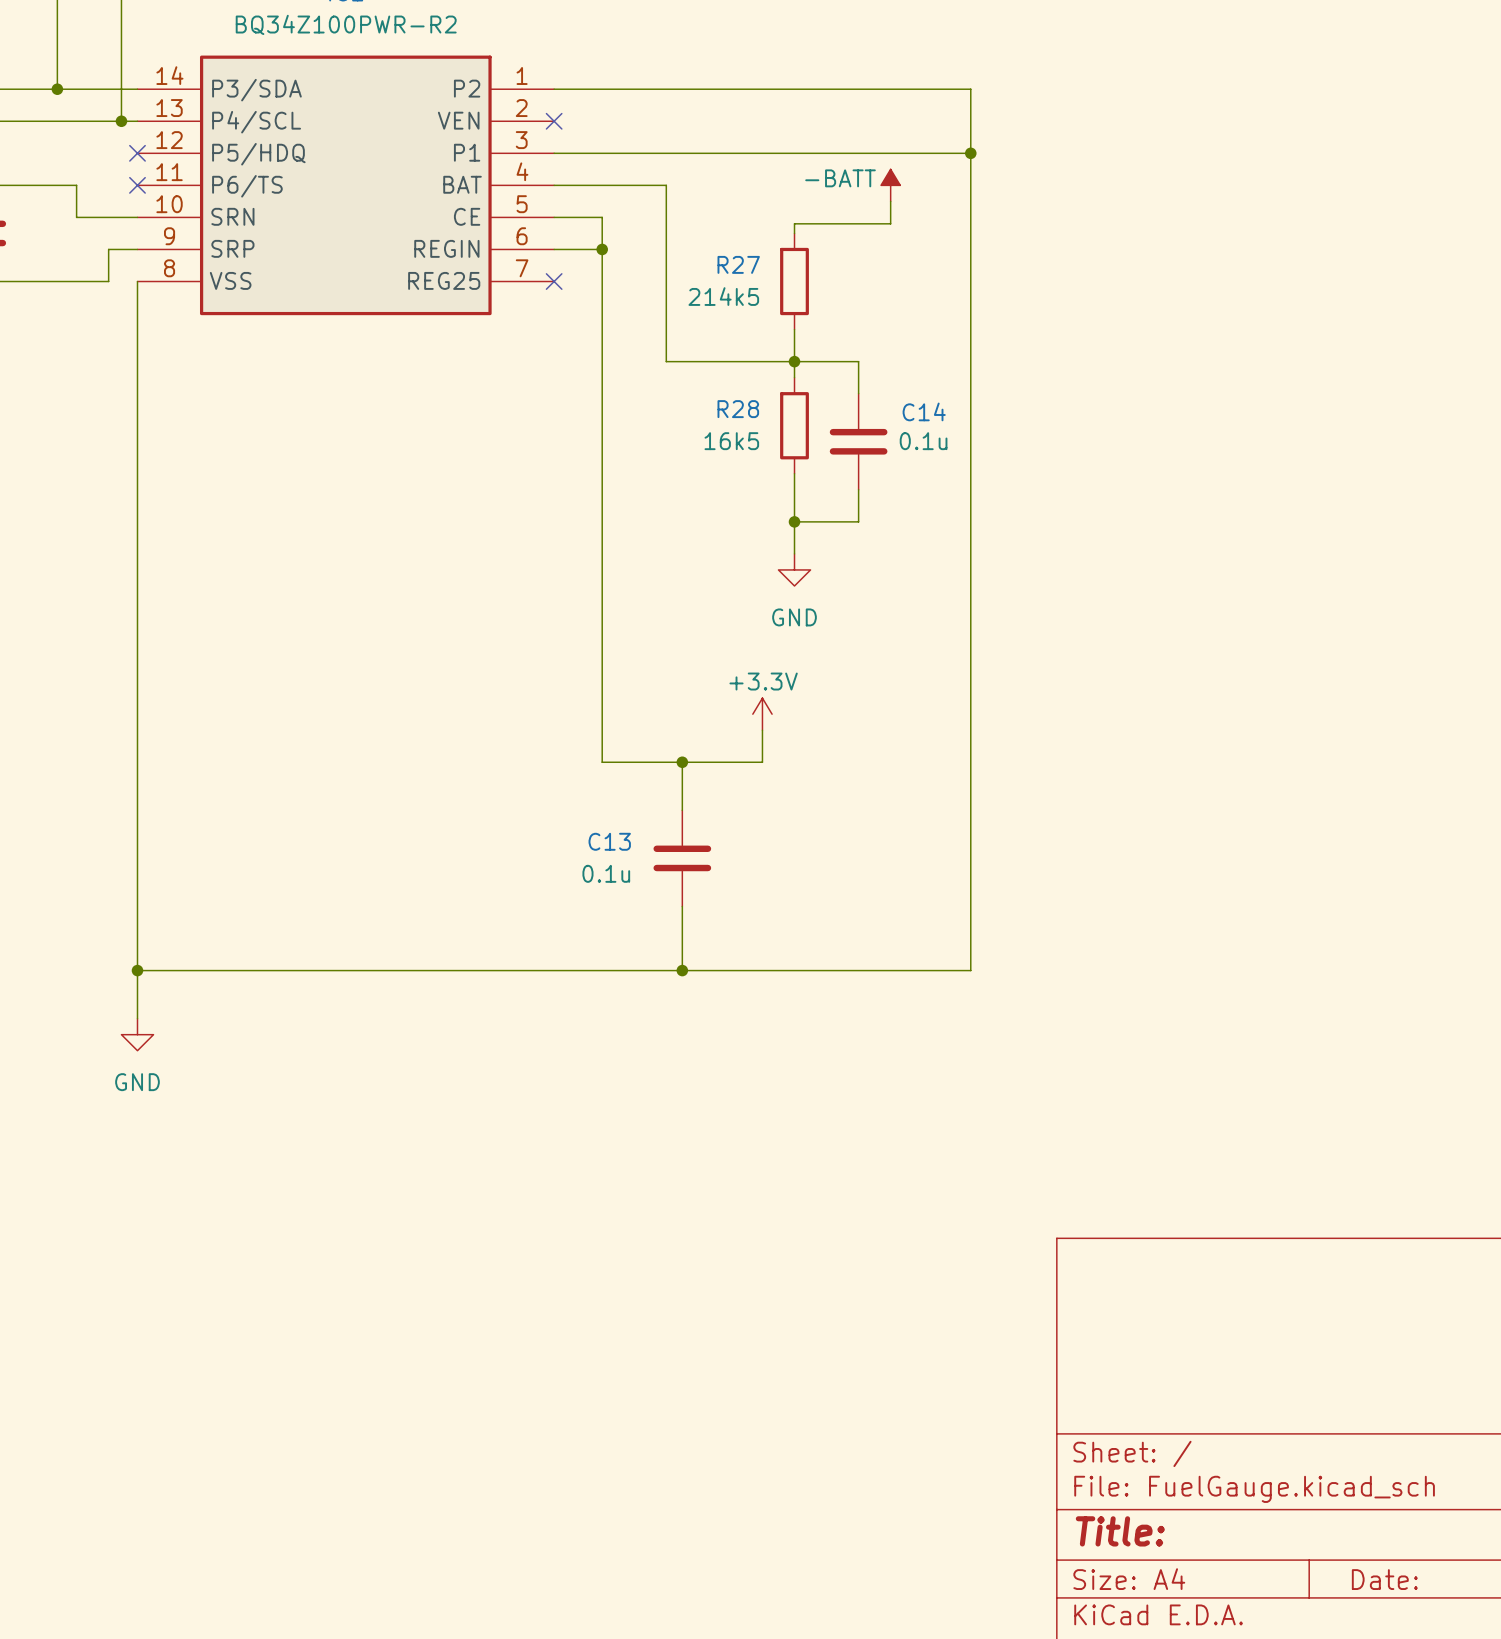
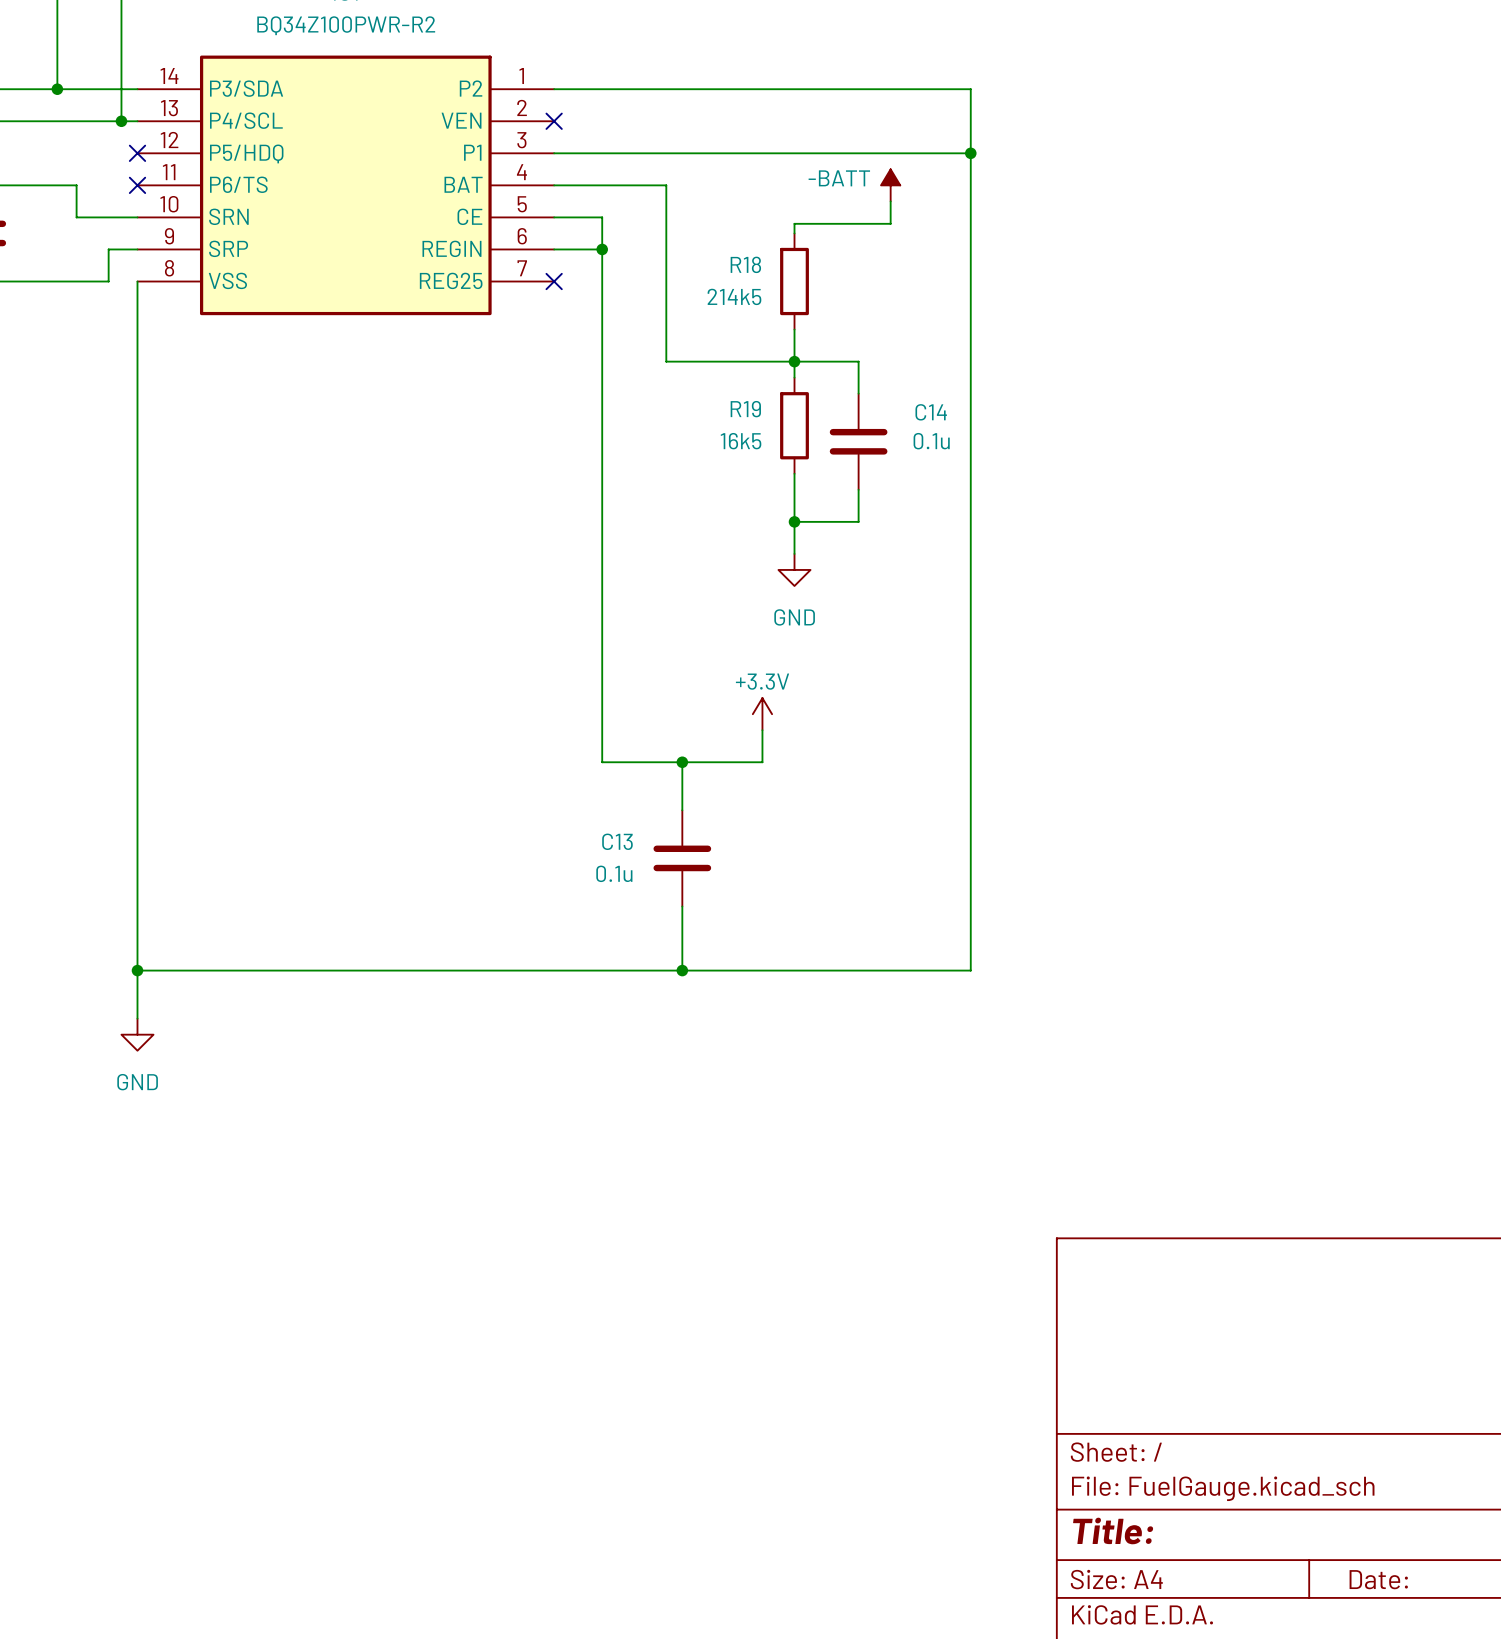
R27 name: R27 (738, 264) -> R18 (745, 264)
R28 name: R28 (738, 409) -> R19 (745, 409)

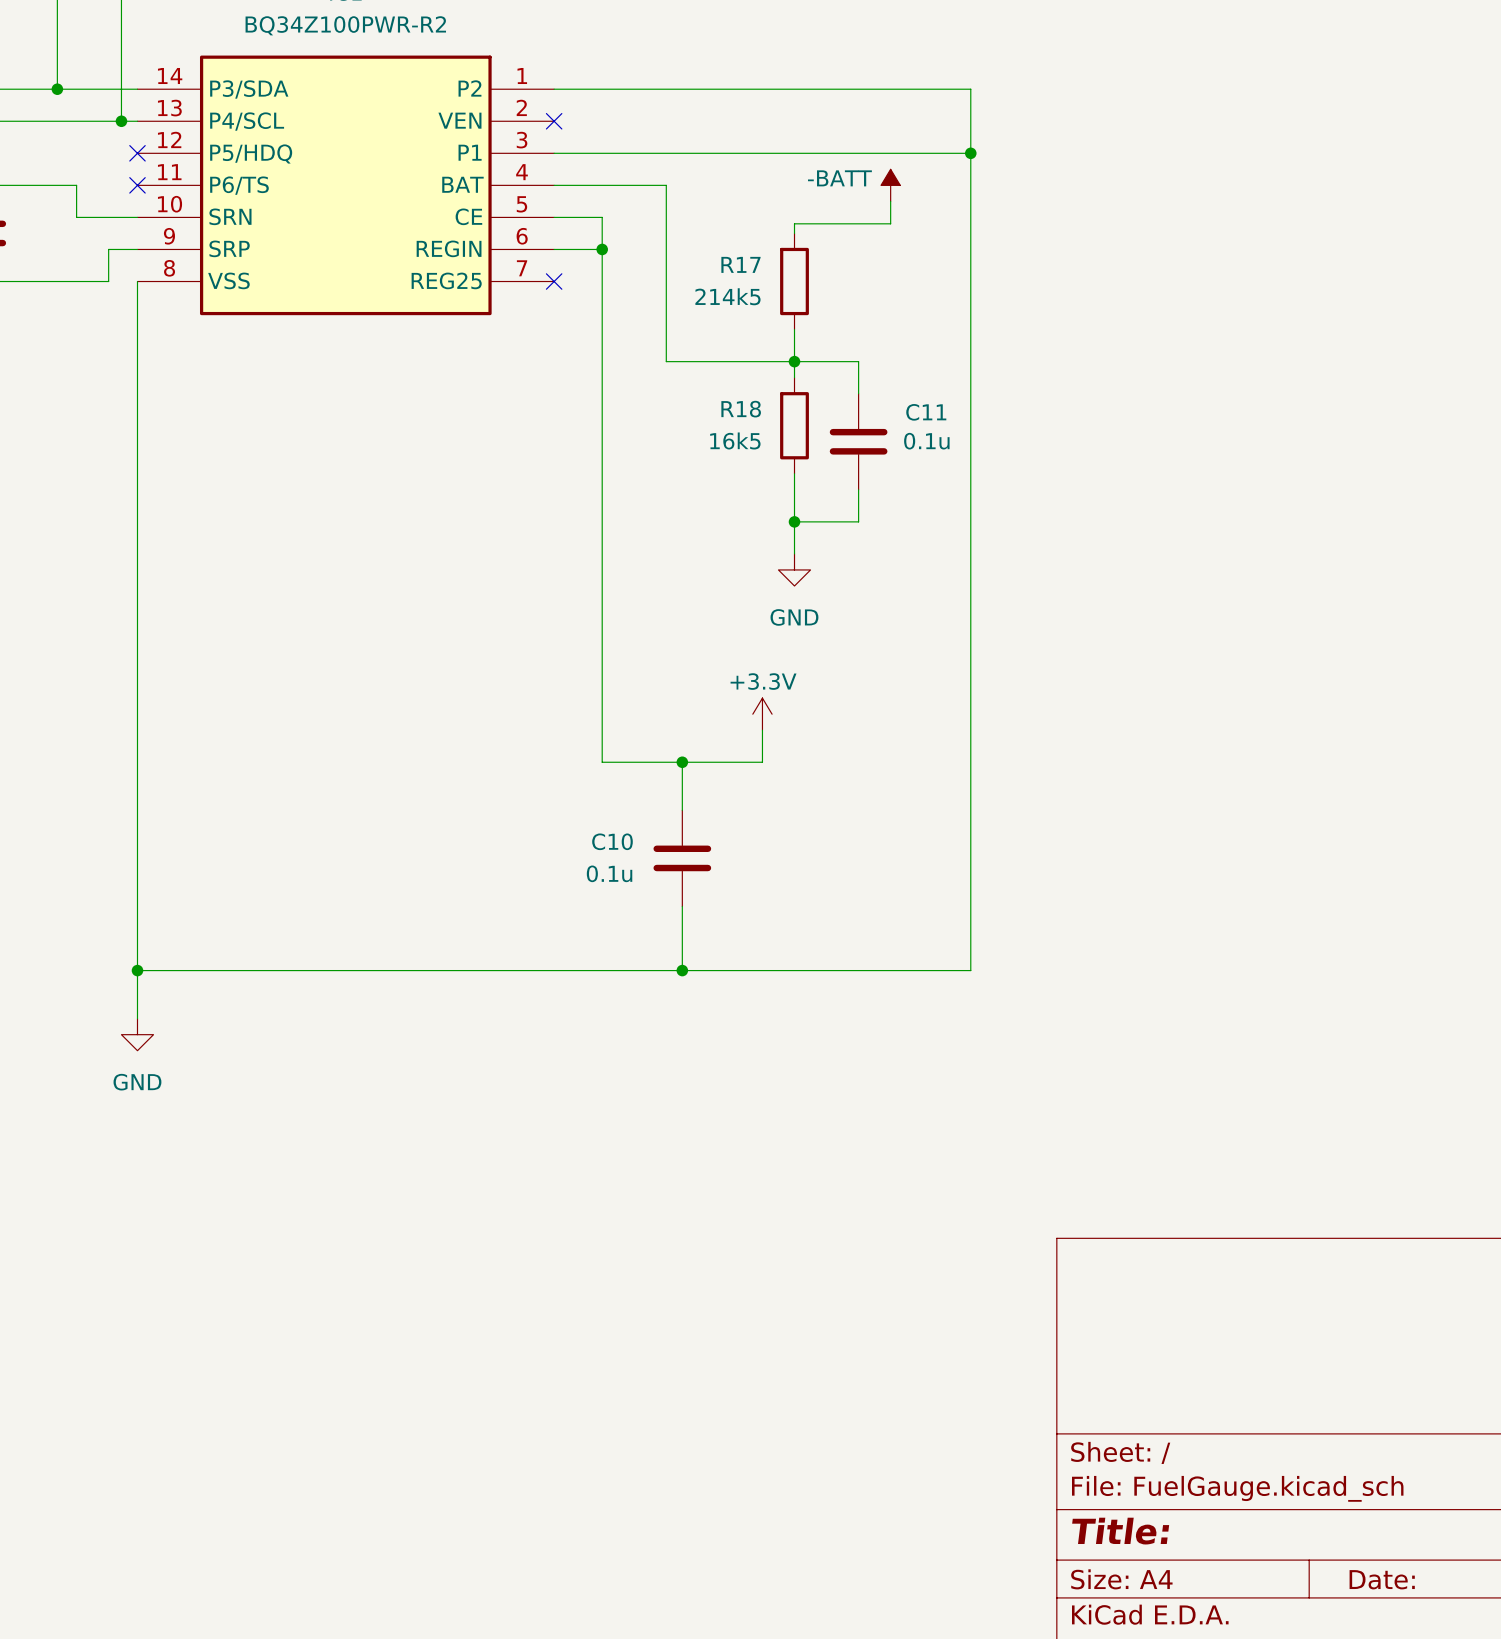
R18 name: R18 (745, 264) -> R17 (740, 264)
R19 name: R19 (745, 409) -> R18 (741, 409)
C14 name: C14 (931, 412) -> C11 (926, 412)
C13 name: C13 (617, 841) -> C10 (612, 841)

